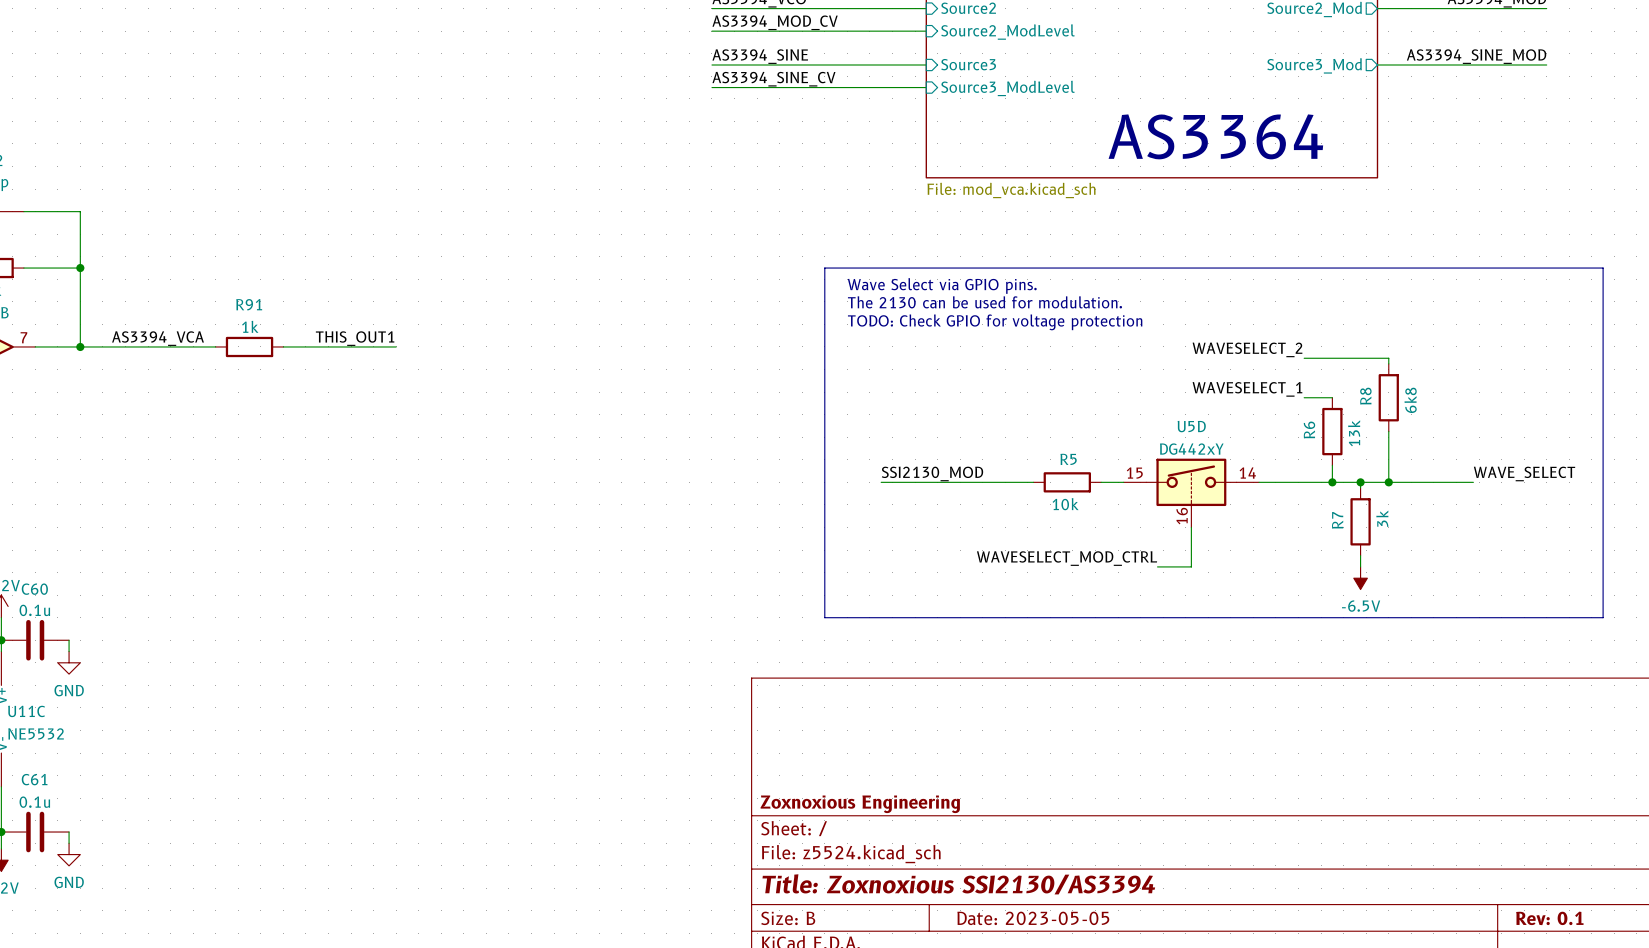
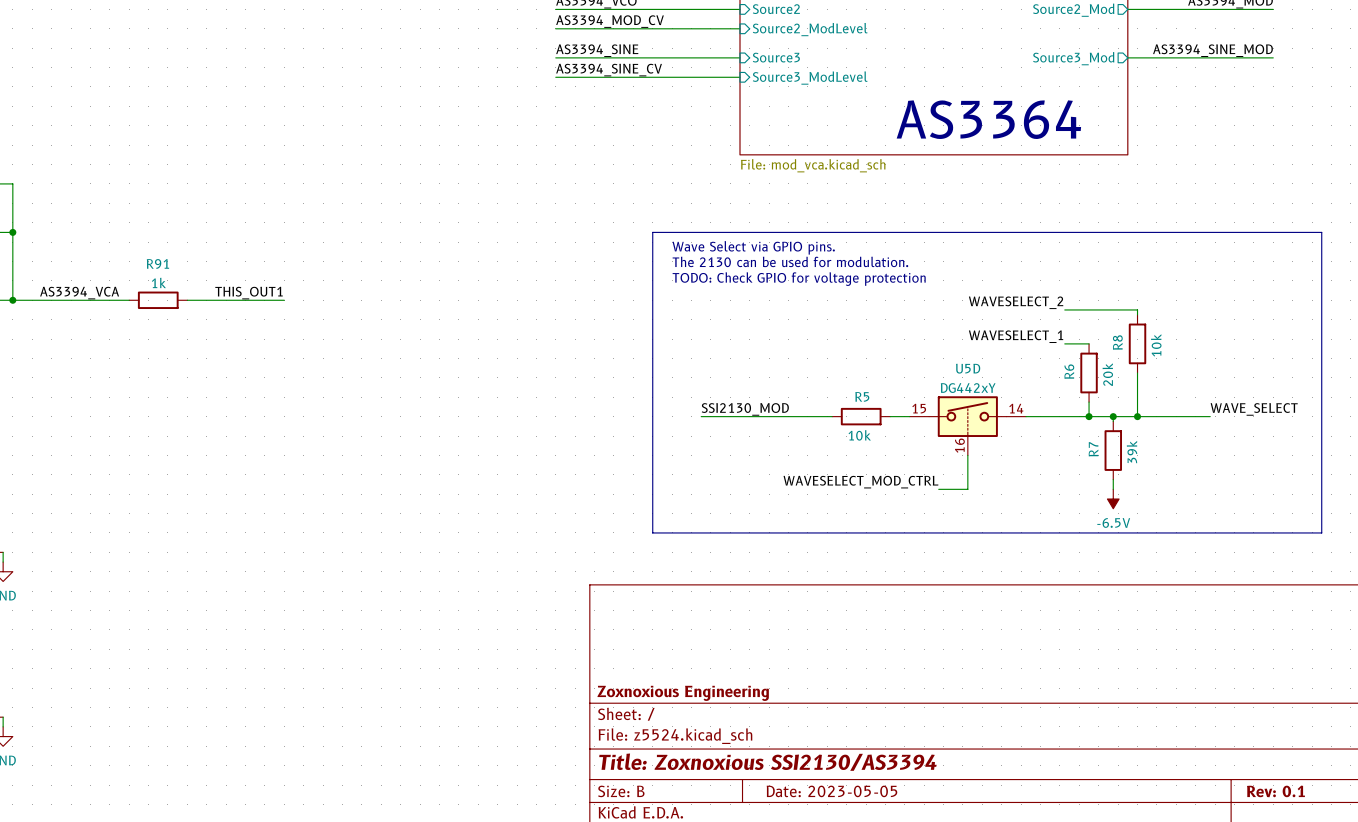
R8 value: 6k8 (1410, 400) -> 10k (1156, 345)
R6 value: 13k (1354, 433) -> 20k (1107, 374)
R7 value: 3k (1382, 518) -> 39k (1132, 452)

